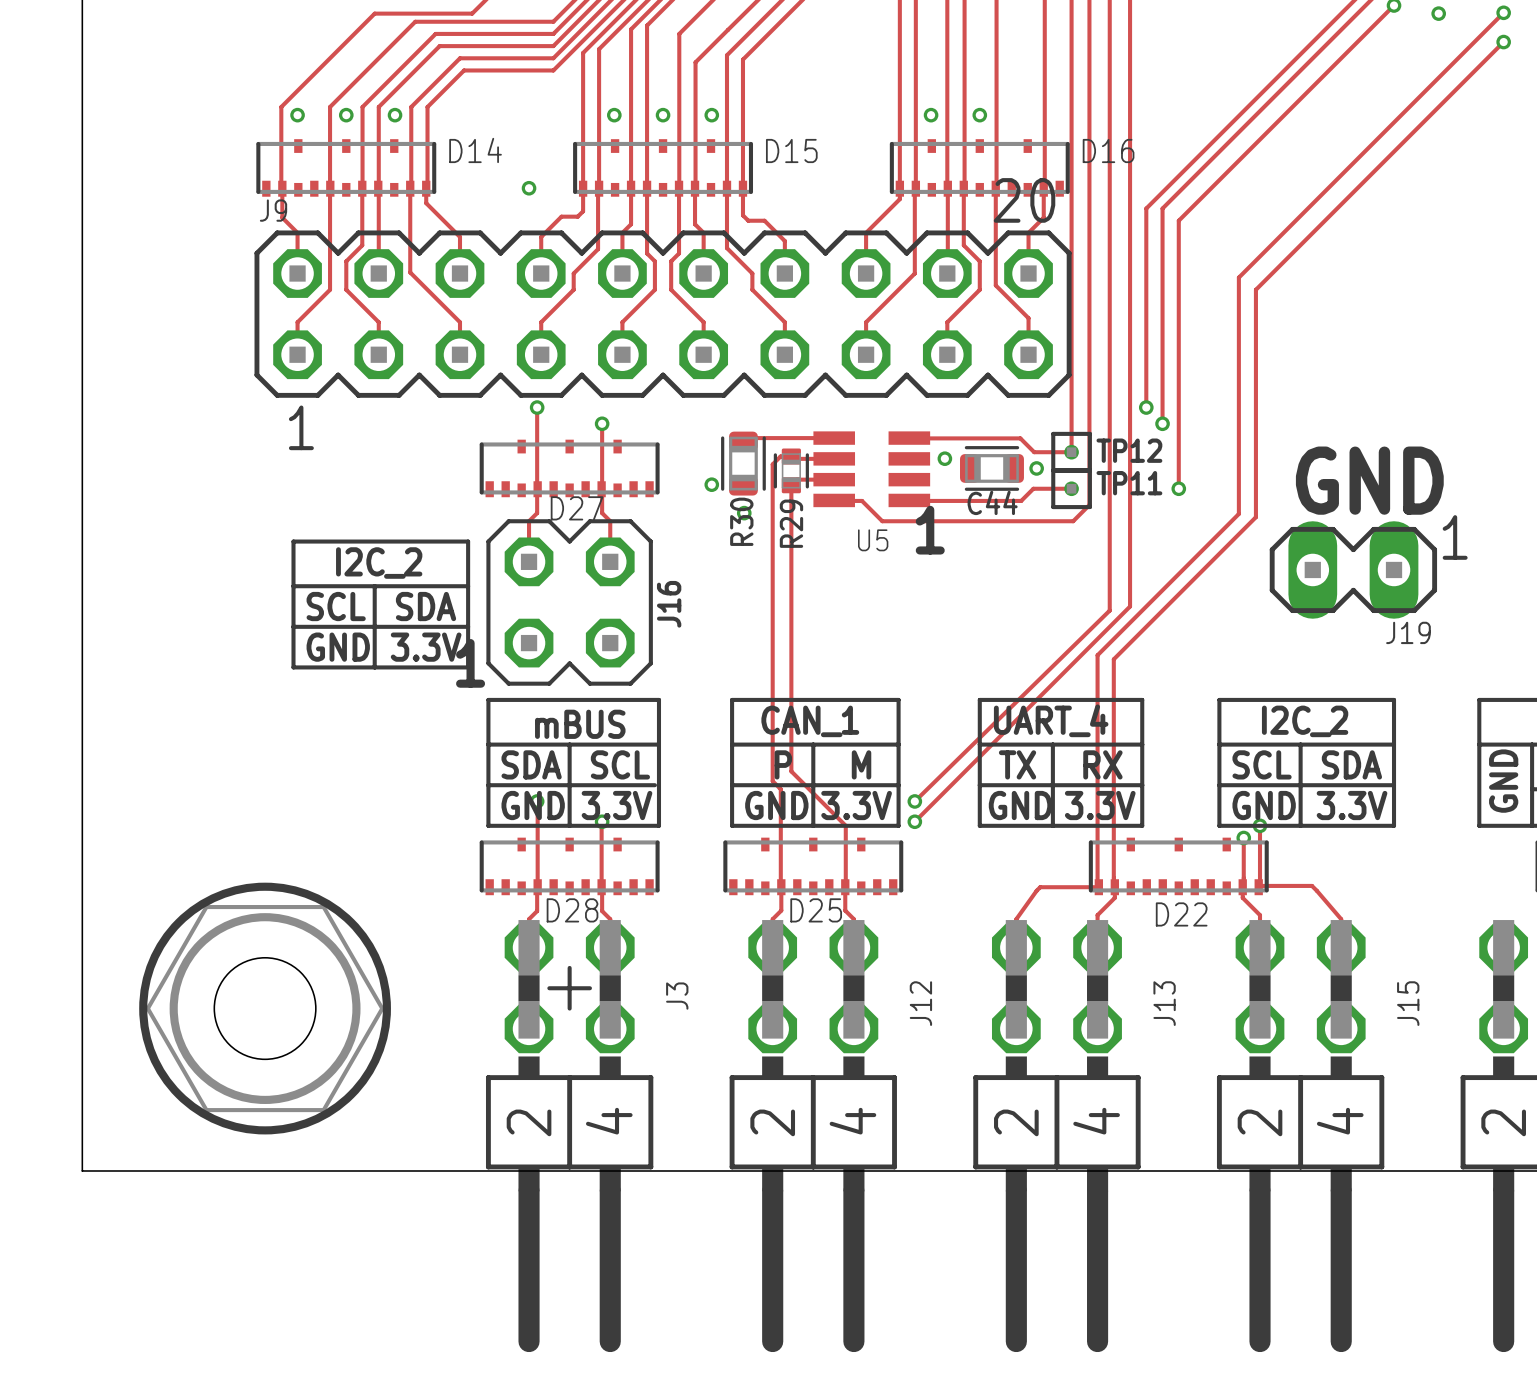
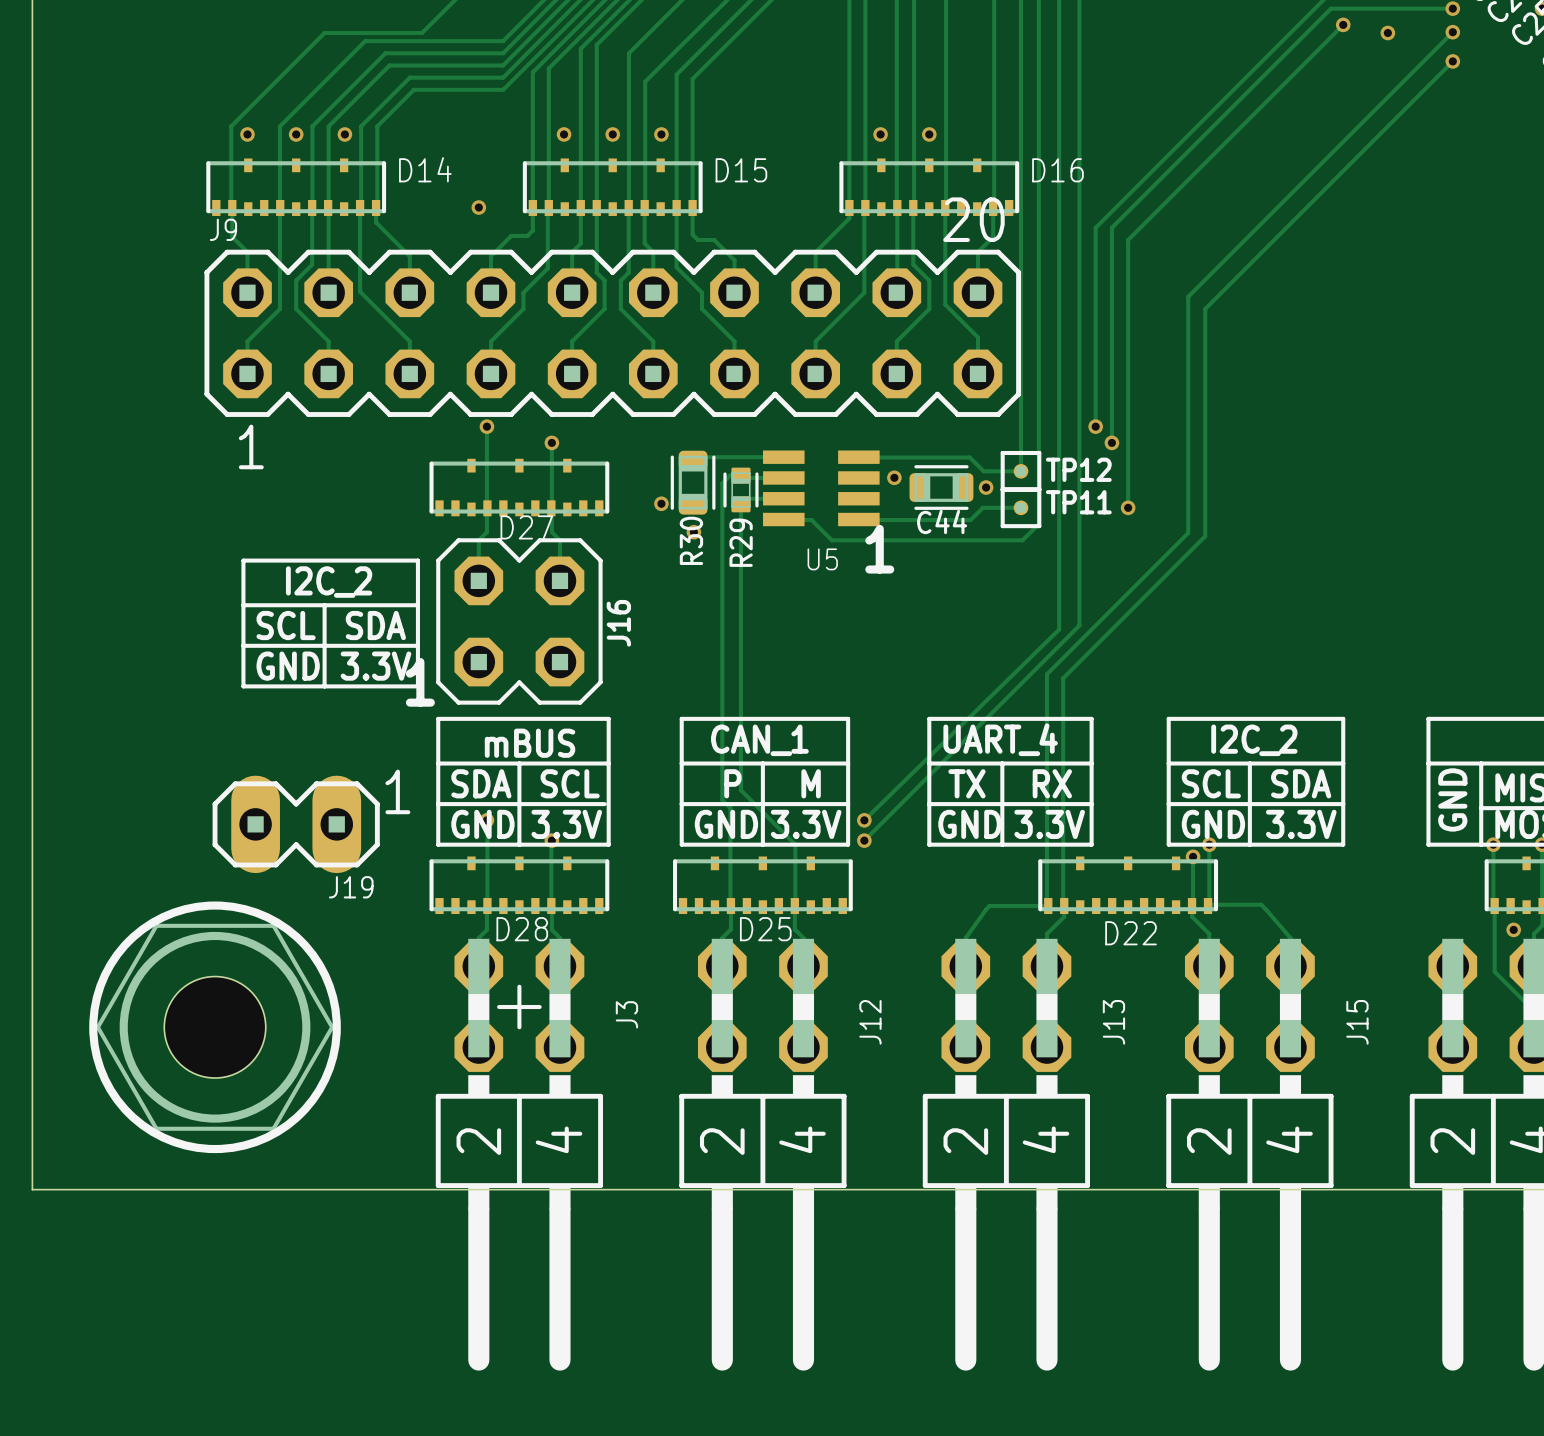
text: GND (1369, 480) -> none
J19 position: (1353, 569) -> (296, 824)

